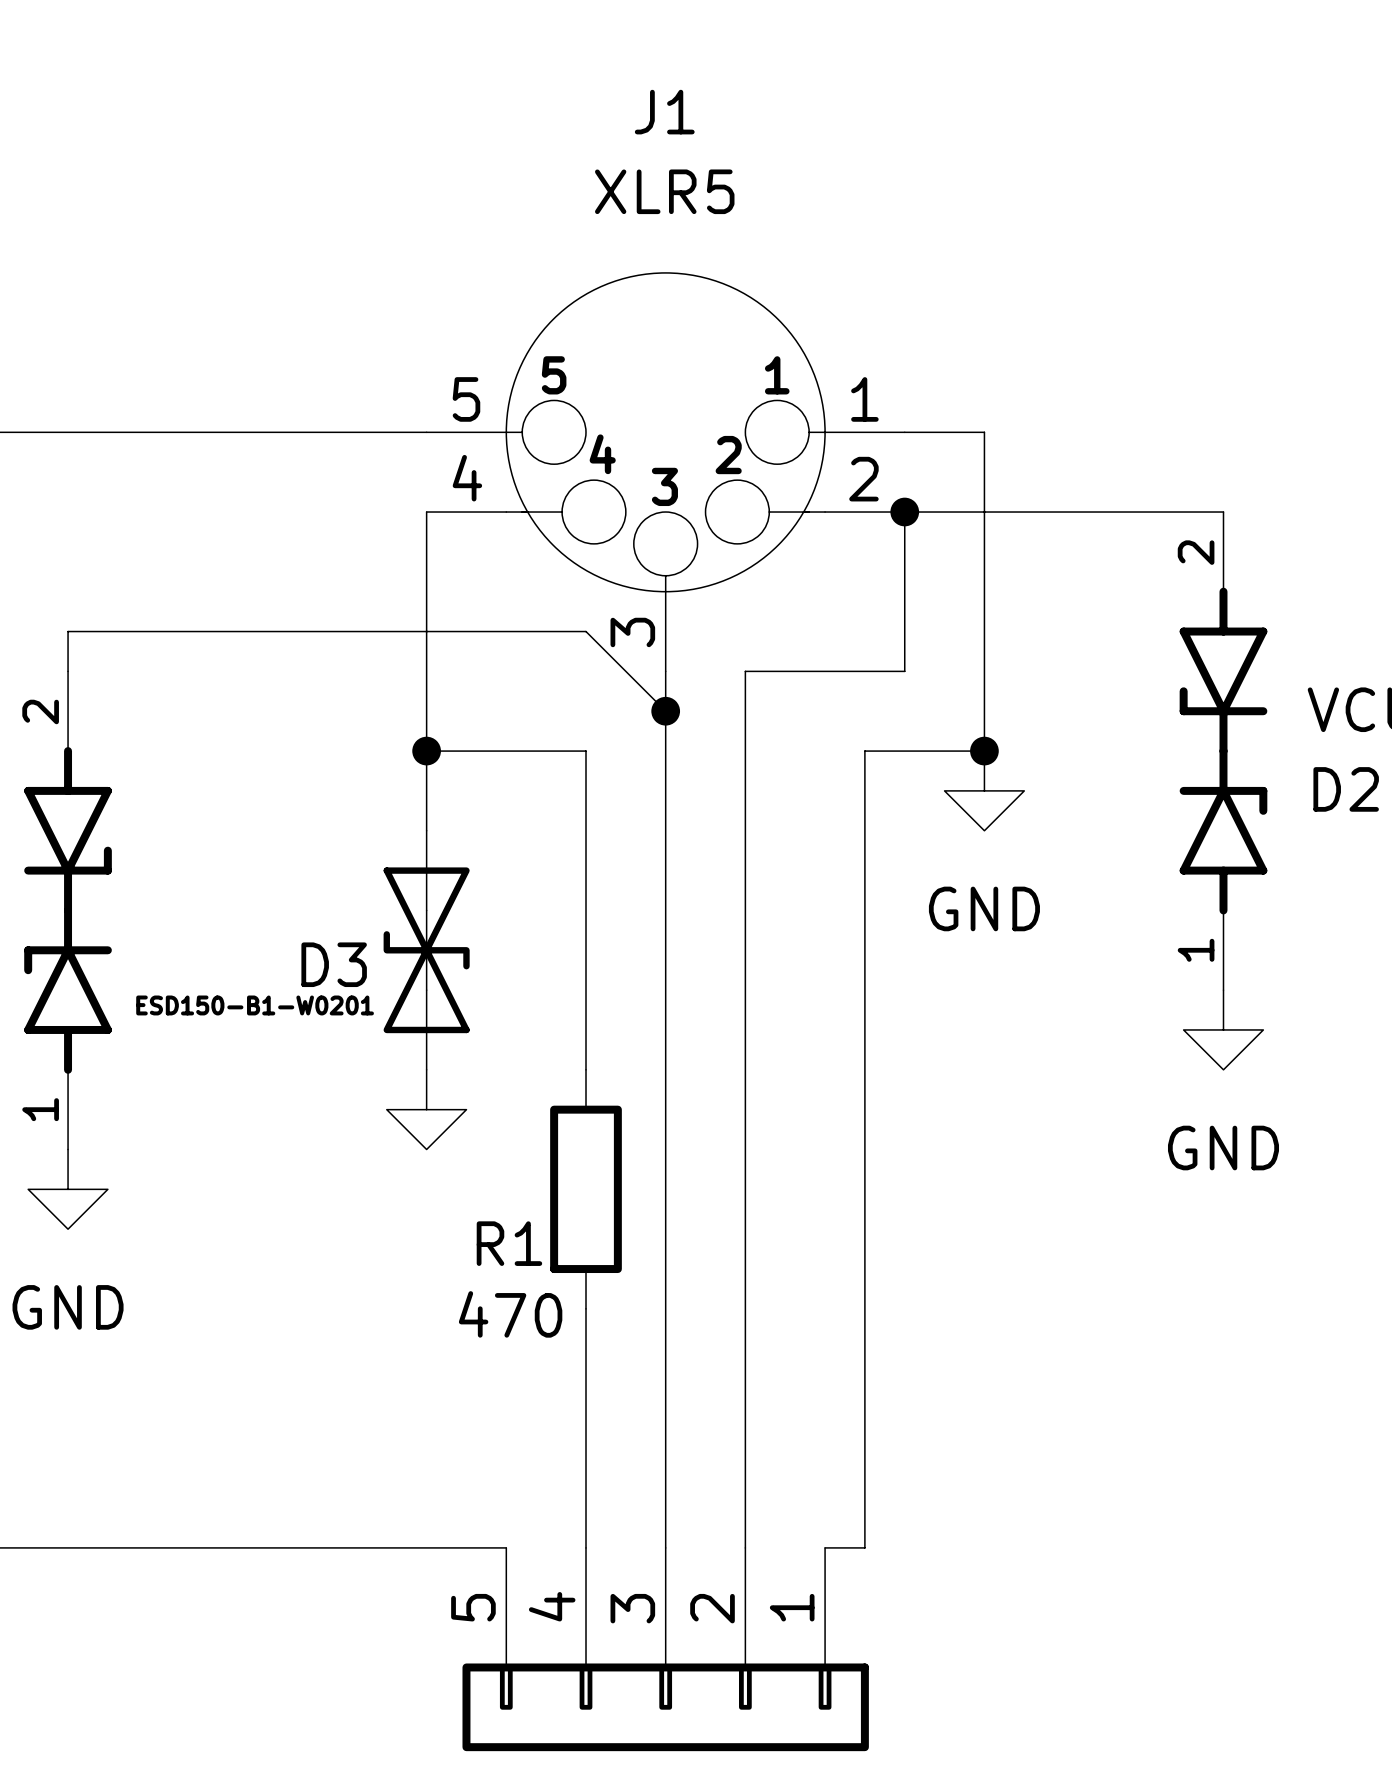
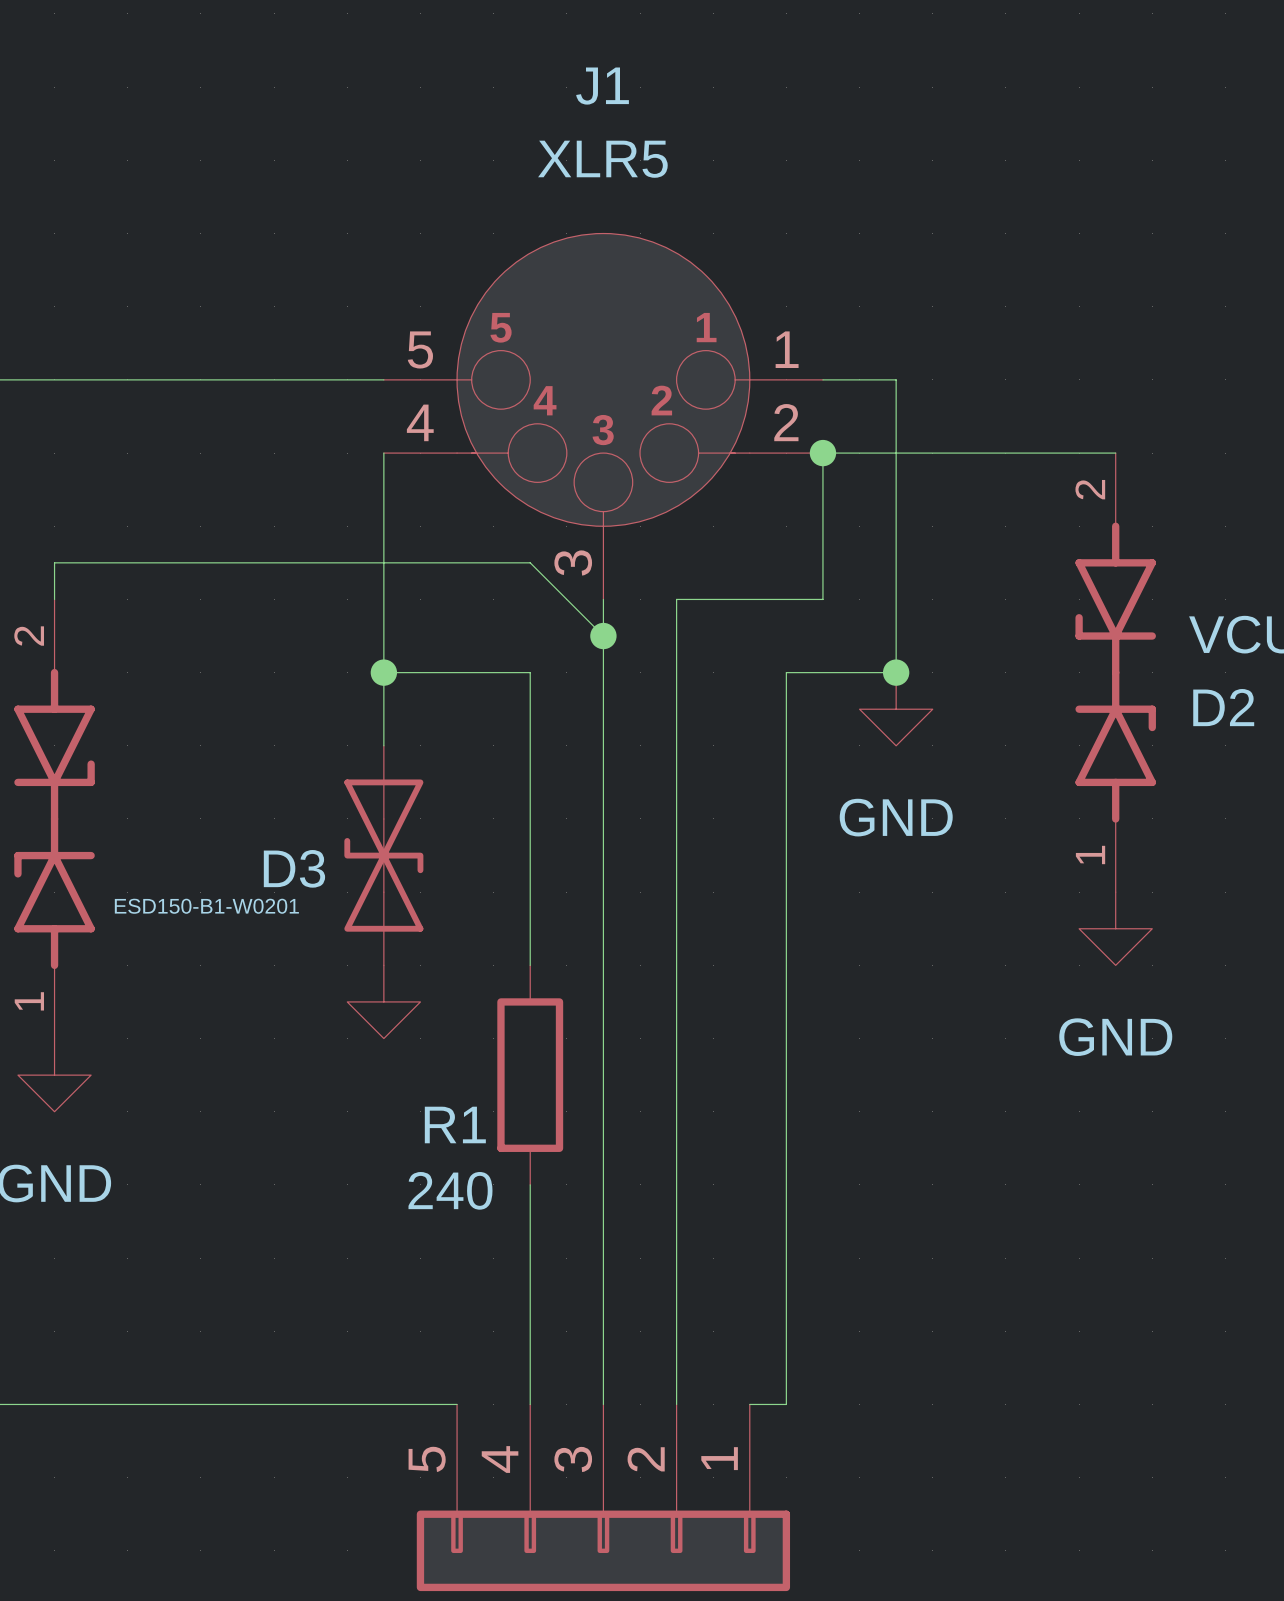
R1 value: 470 (510, 1314) -> 240 (450, 1190)

